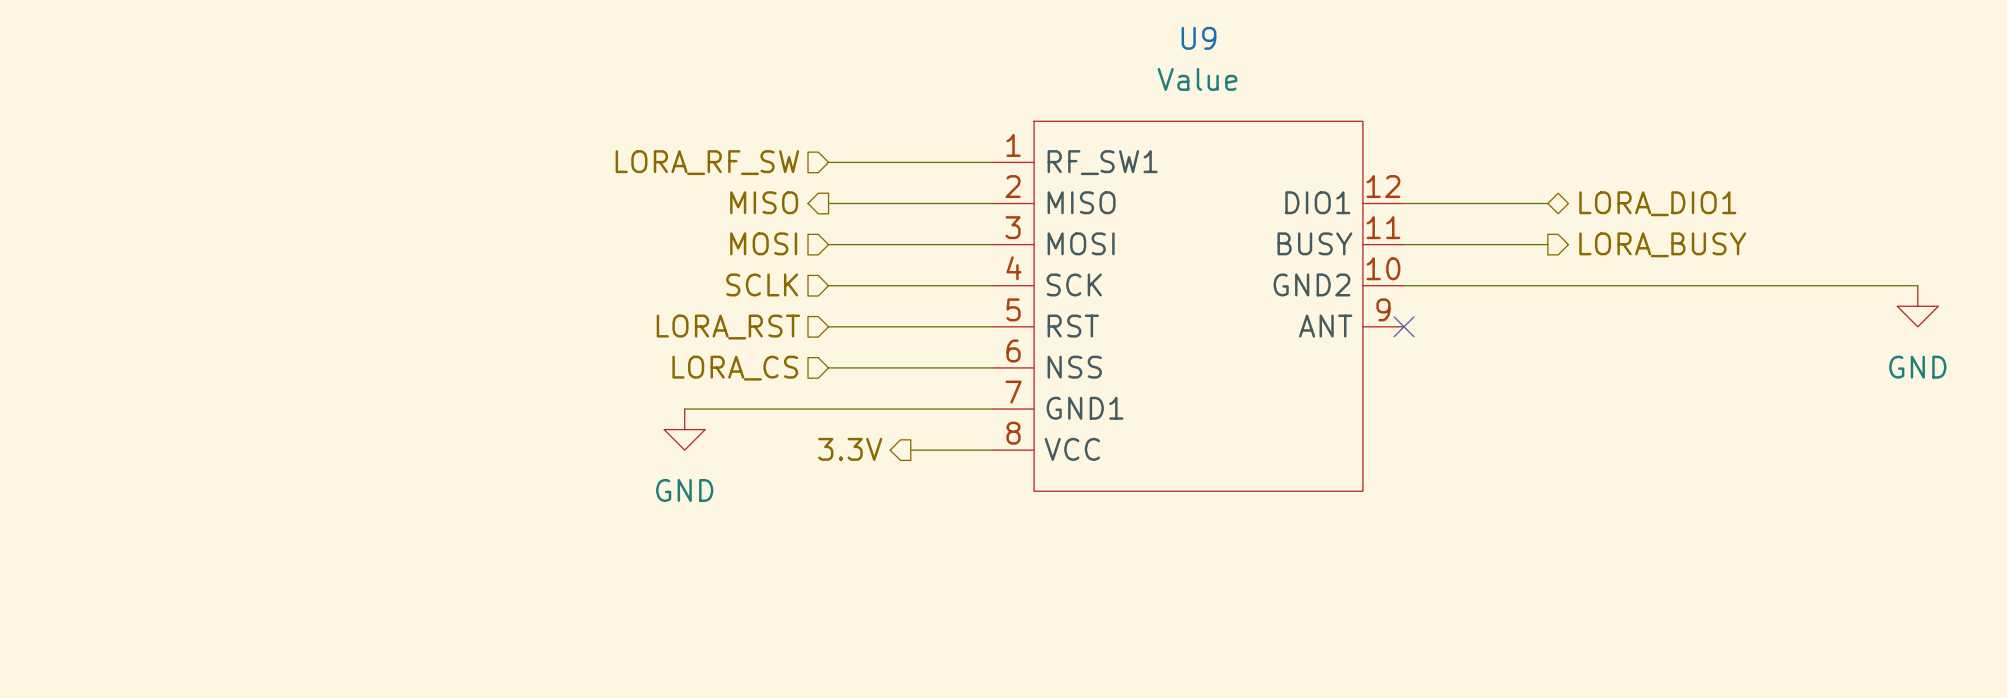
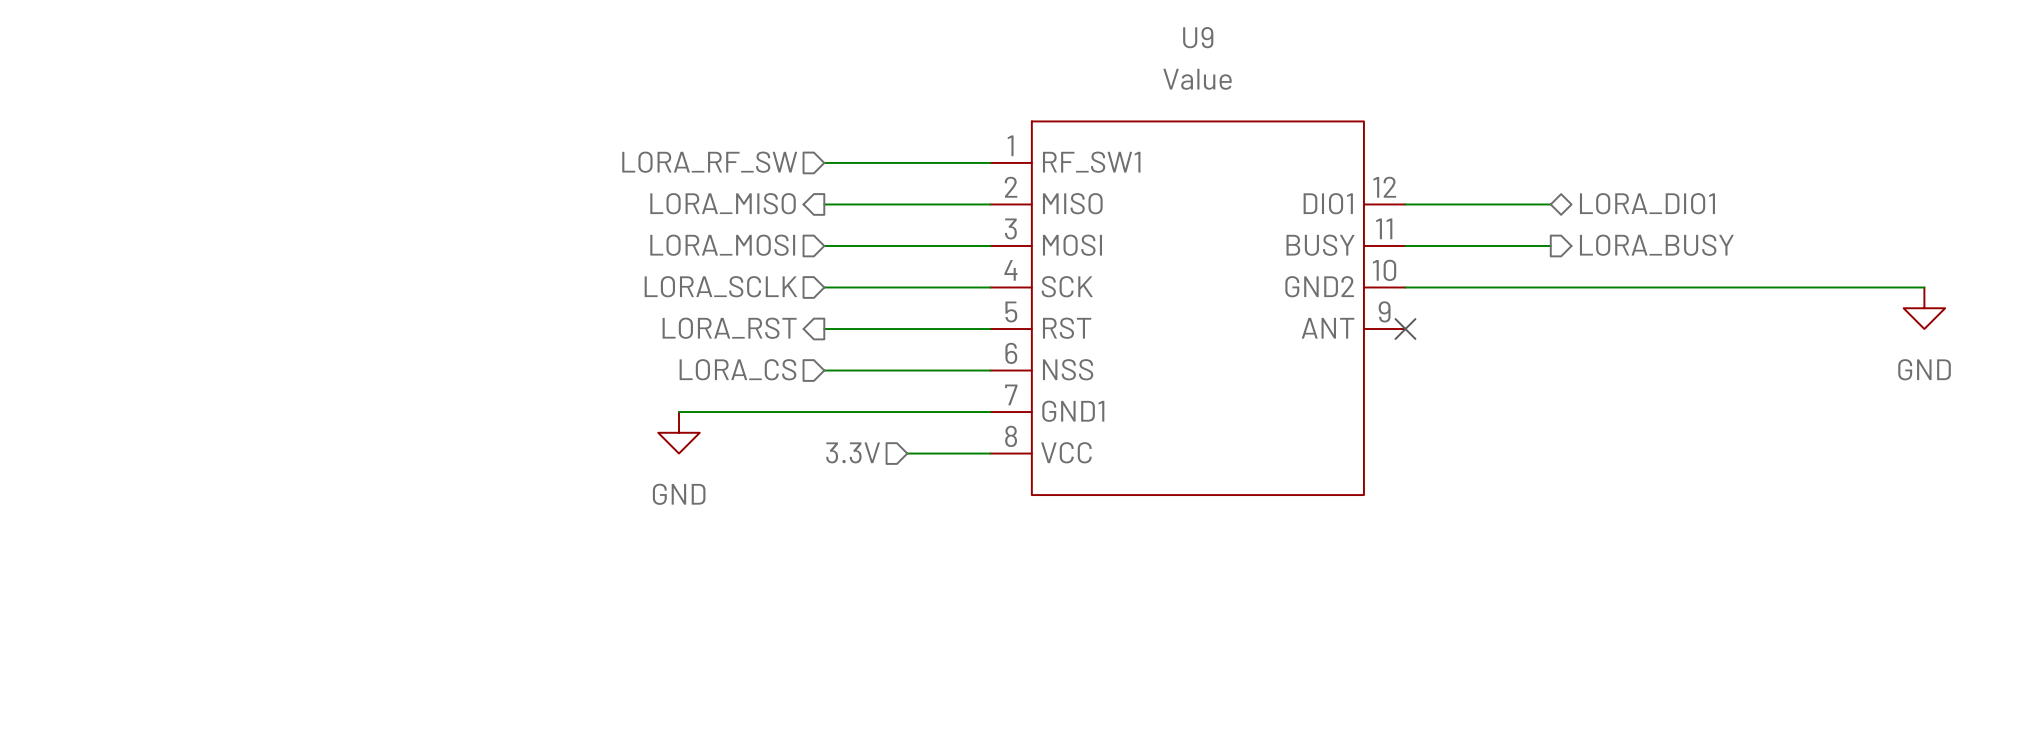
hierarchical label: MISO (764, 202) -> LORA_MISO (723, 203)
hierarchical label: MOSI (763, 243) -> LORA_MOSI (722, 245)
hierarchical label: SCLK (762, 284) -> LORA_SCLK (720, 286)
hierarchical label shape: input (728, 327) -> output (729, 328)
hierarchical label shape: output (850, 449) -> input (853, 452)

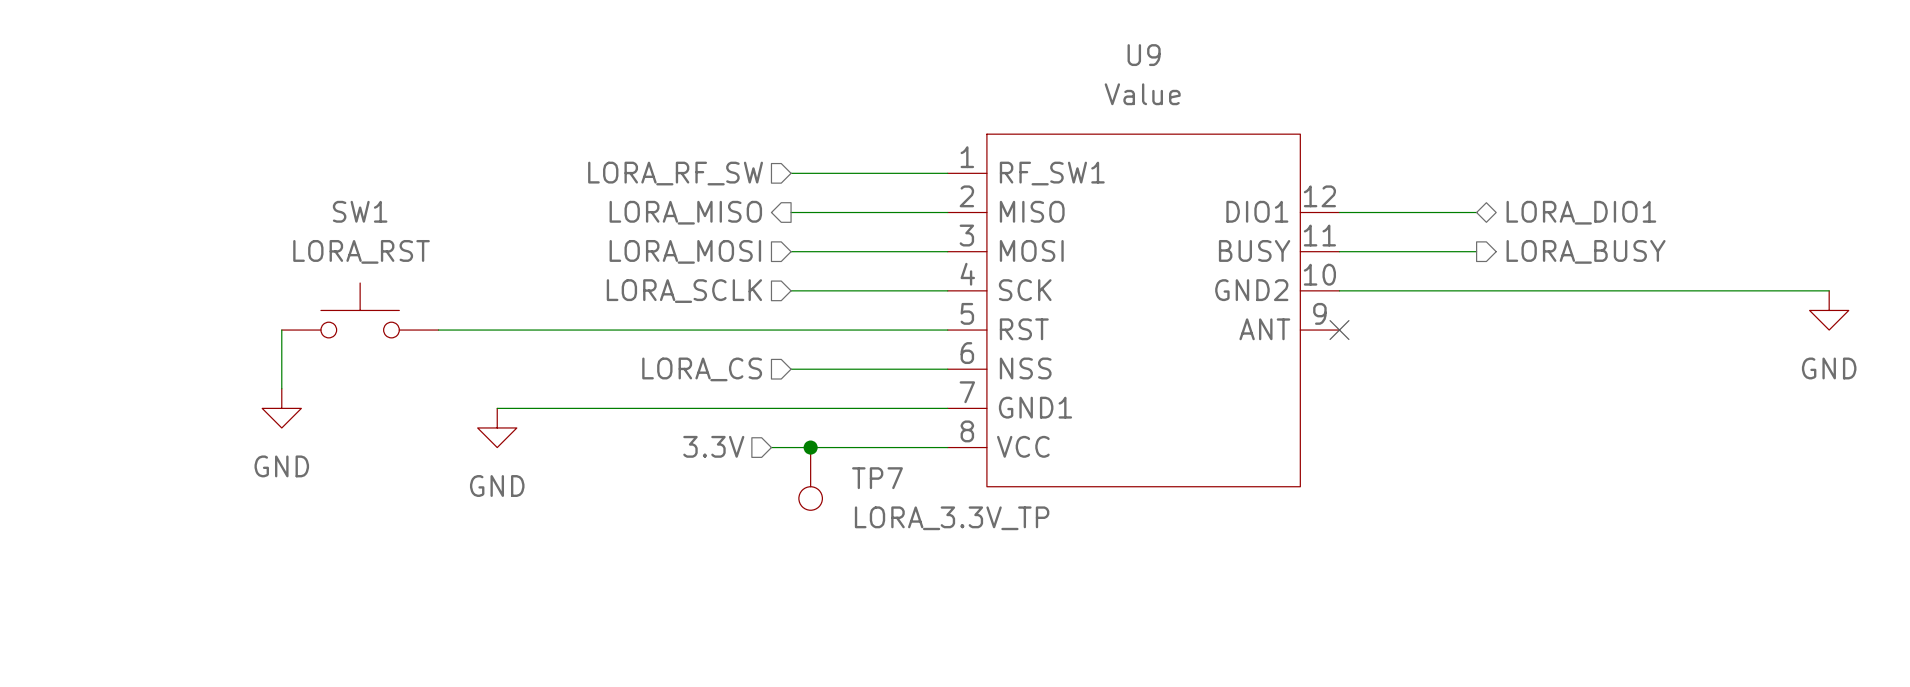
SW1: none -> LORA_RST (360, 310)
hierarchical label: LORA_RST (729, 328) -> none
wire: none -> (281, 330) (281, 388)
wire: none -> (438, 330) (791, 330)
power symbol: none -> GND (281, 408)
wire: none -> (497, 408) (653, 408)
power symbol position: GND (679, 432) -> GND (497, 427)
hierarchical label position: 3.3V (853, 452) -> 3.3V (713, 446)
wire: none -> (771, 447) (869, 447)
junction: none -> (810, 447)
TP7: none -> LORA_3.3V_TP (810, 478)

